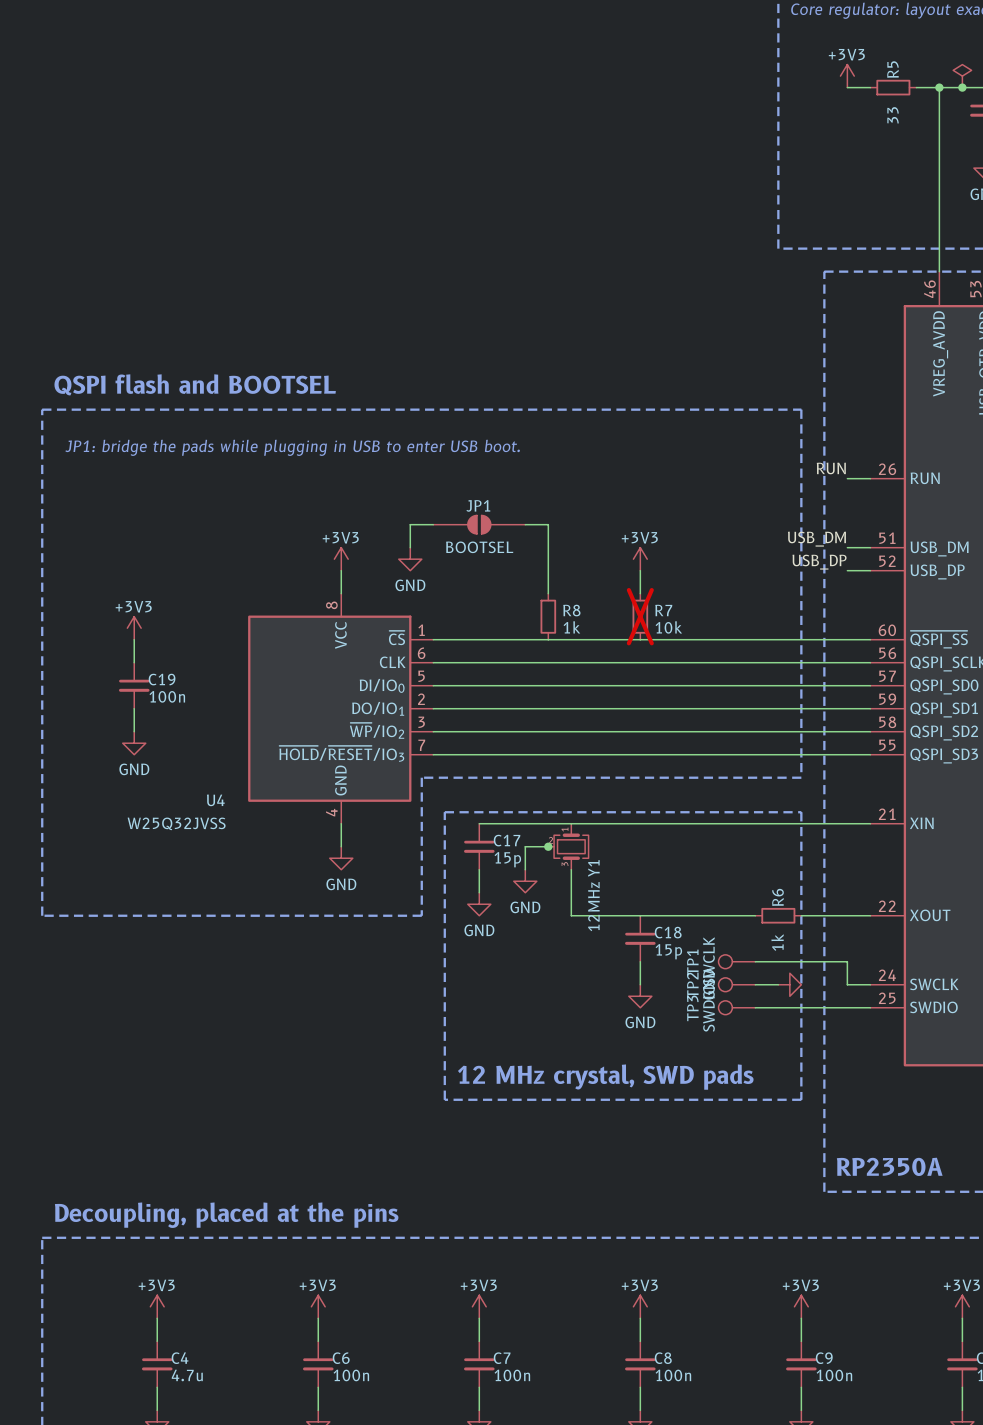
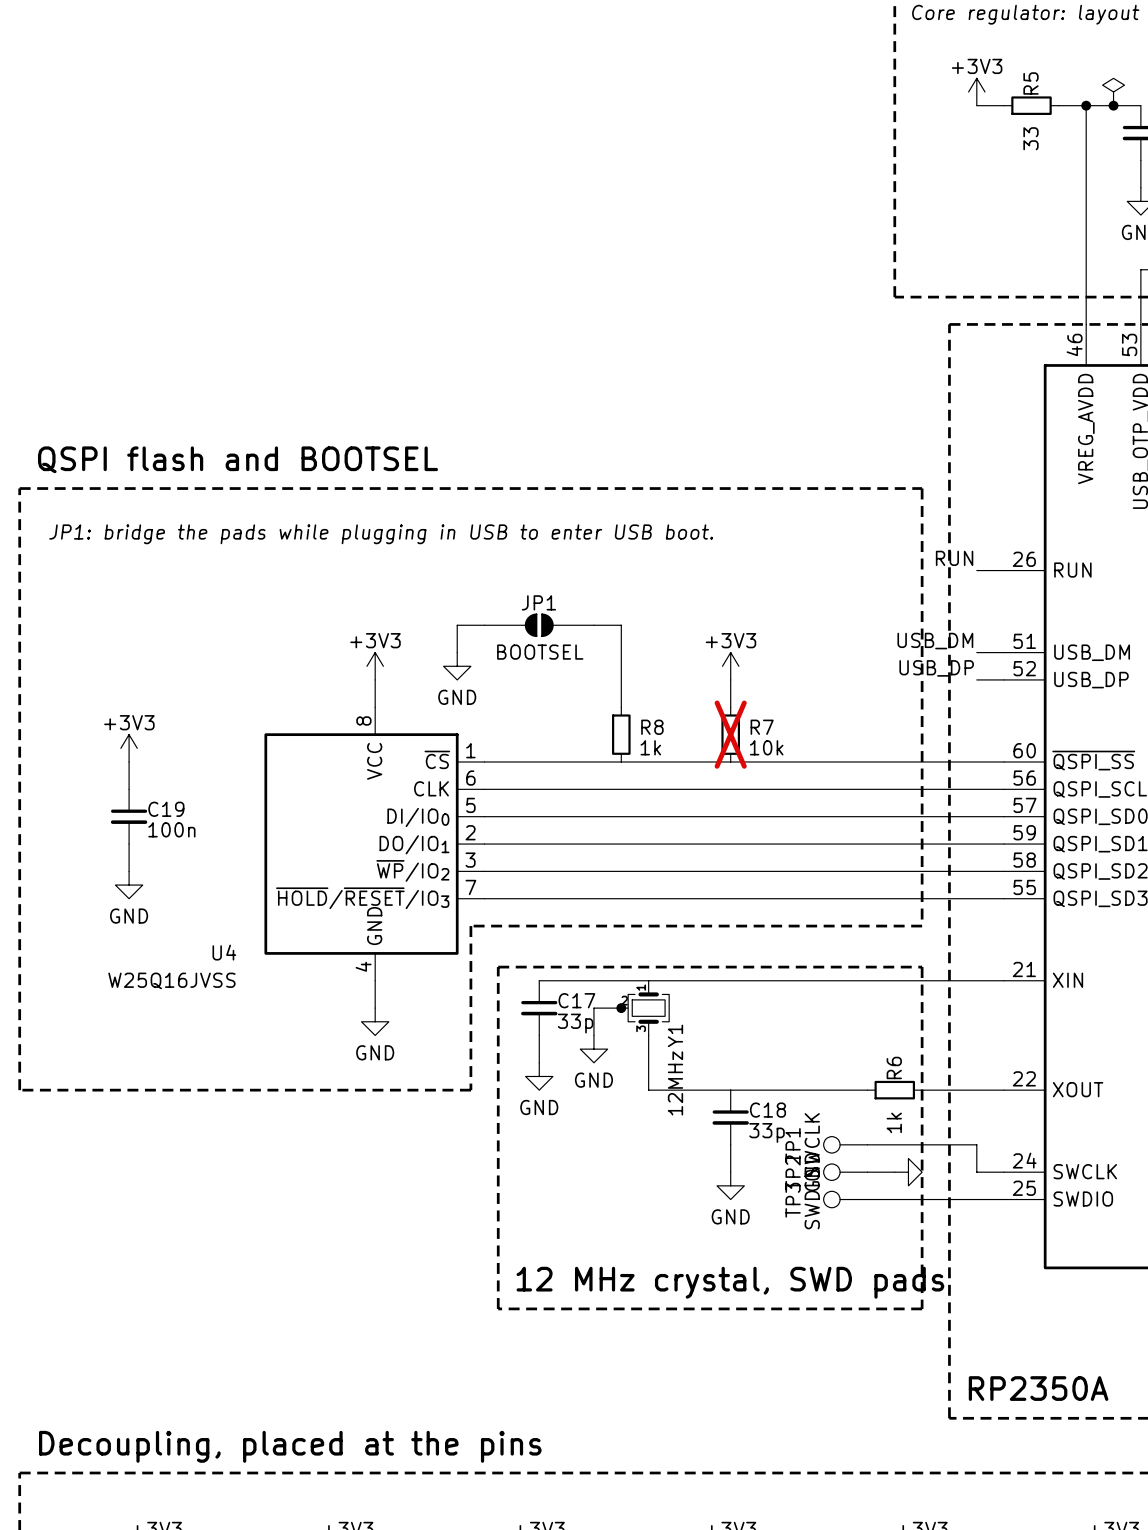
U4 value: W25Q32JVSS (176, 823) -> W25Q16JVSS (171, 980)
C17 value: 15p (507, 859) -> 33p (575, 1023)
C18 value: 15p (668, 951) -> 33p (767, 1132)

